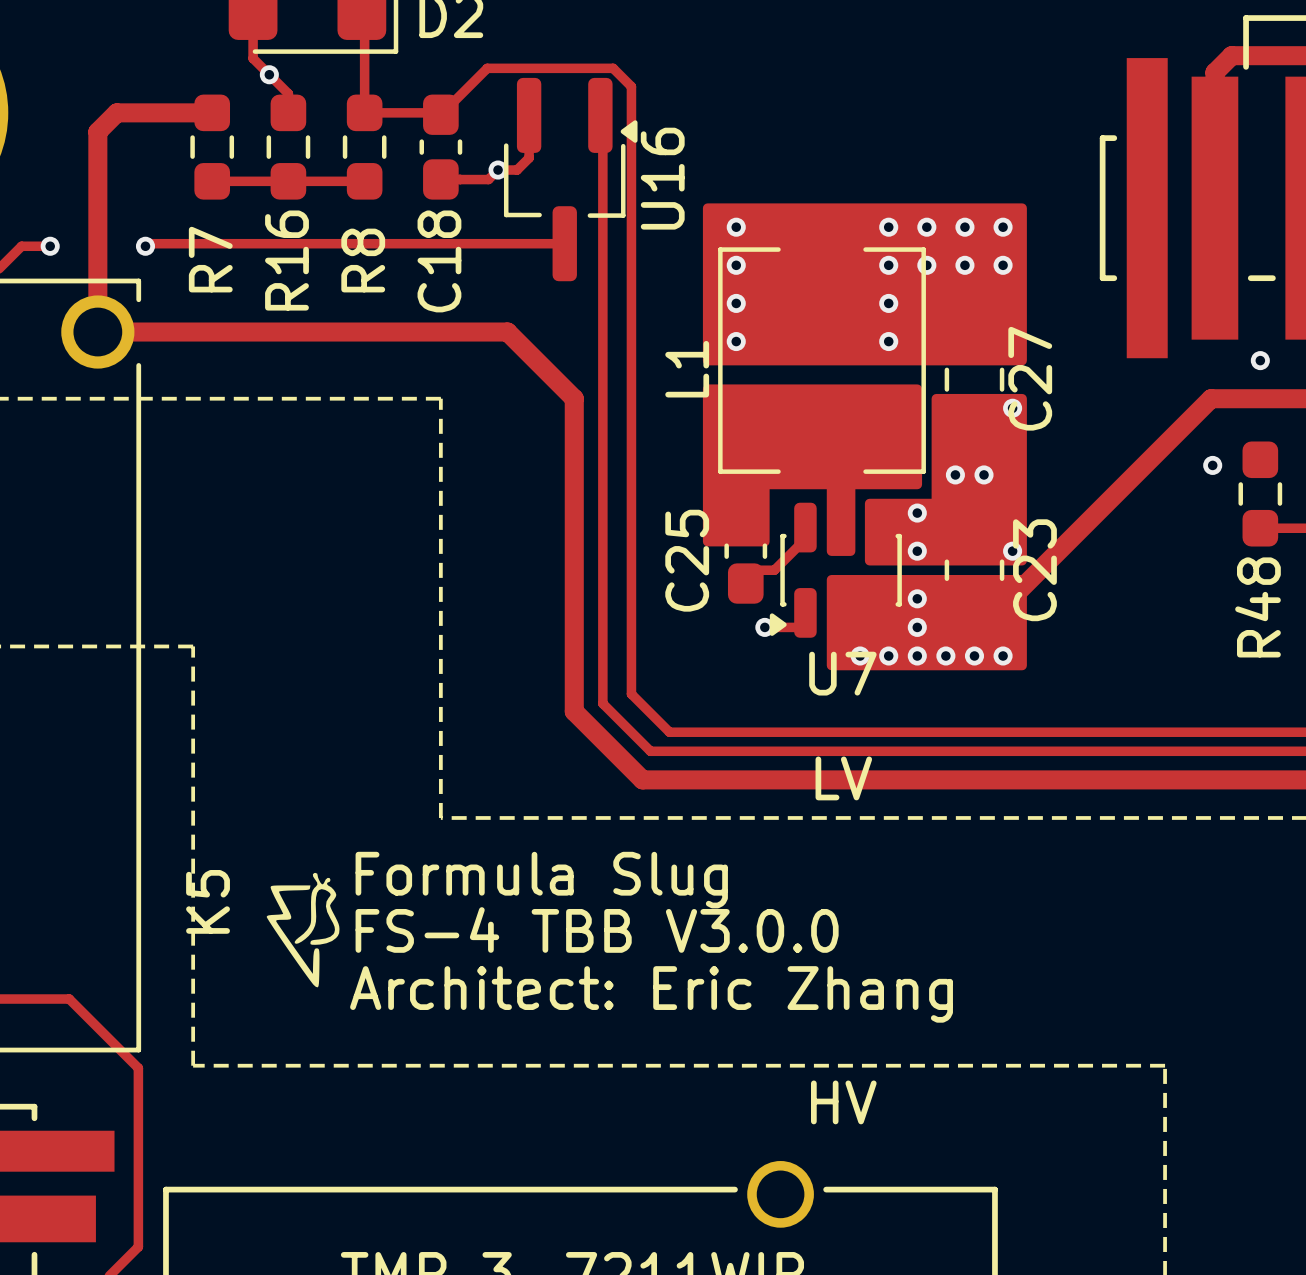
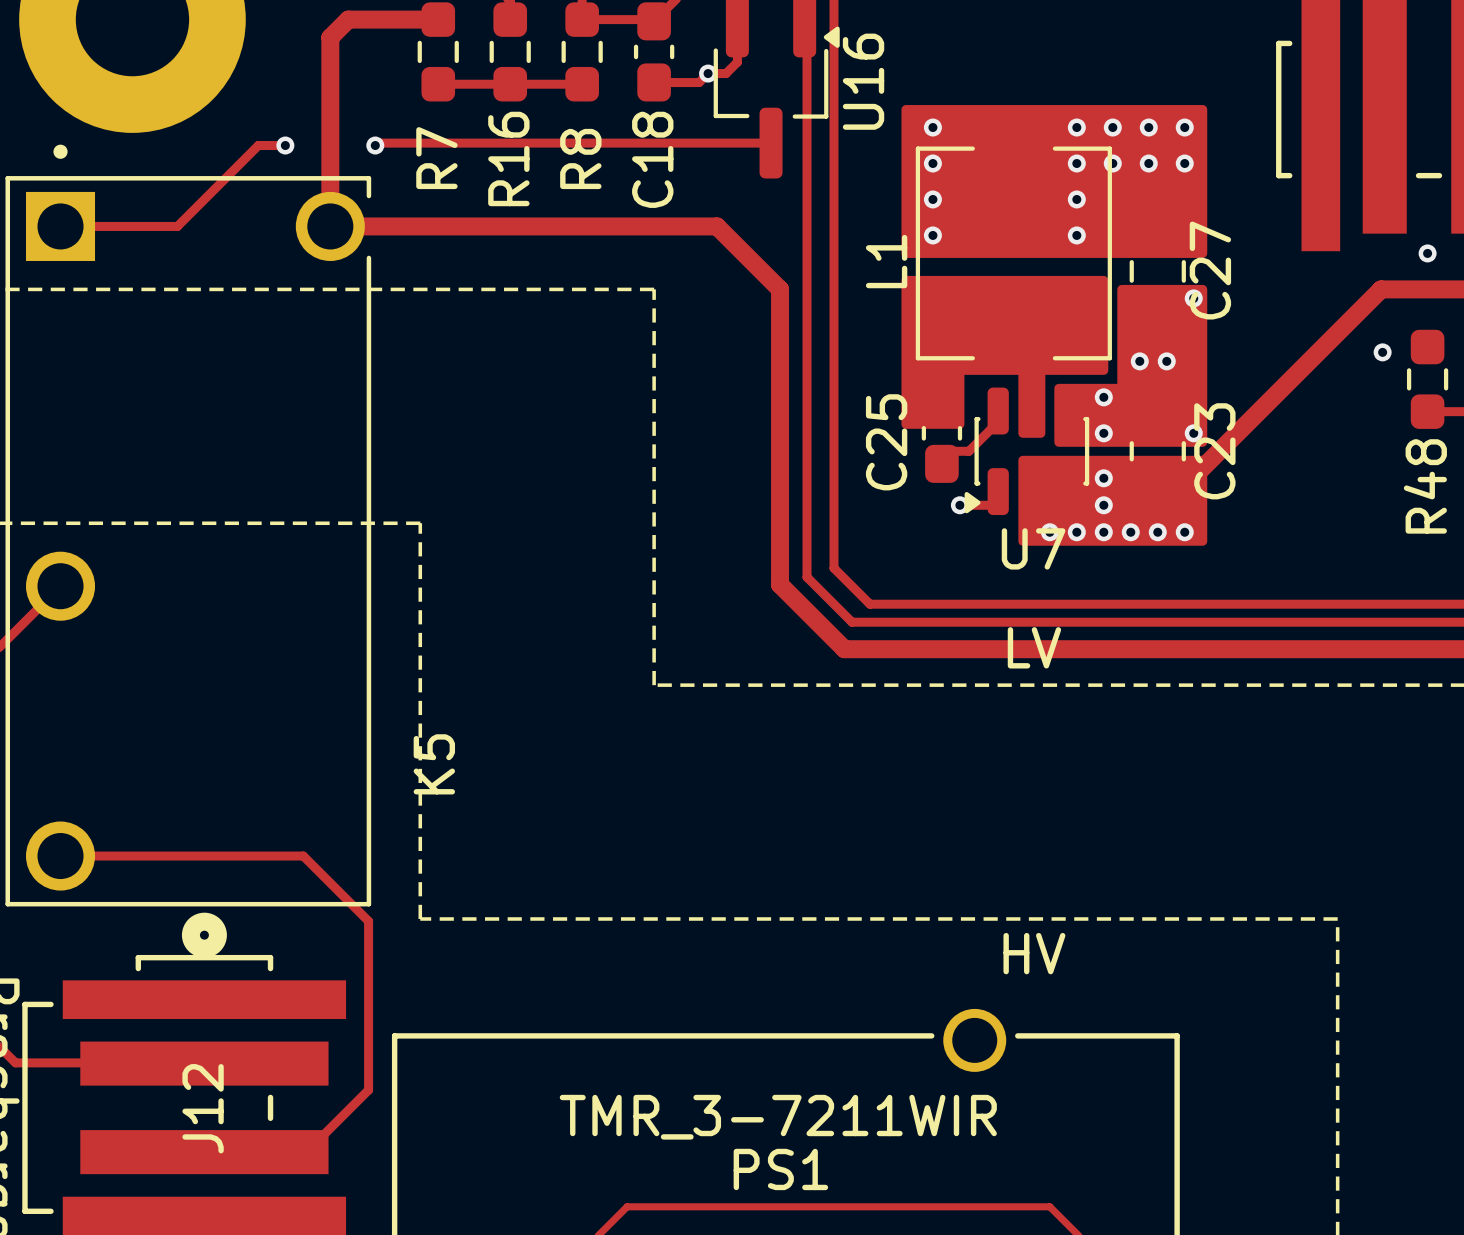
drawing: [266, 872, 340, 988] -> none

